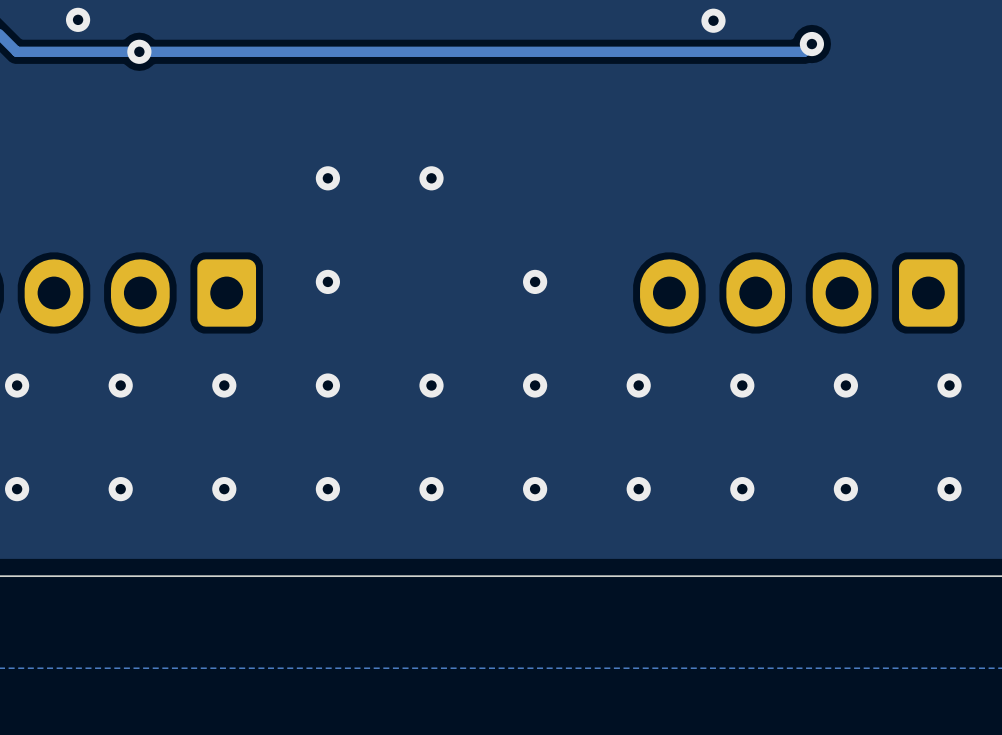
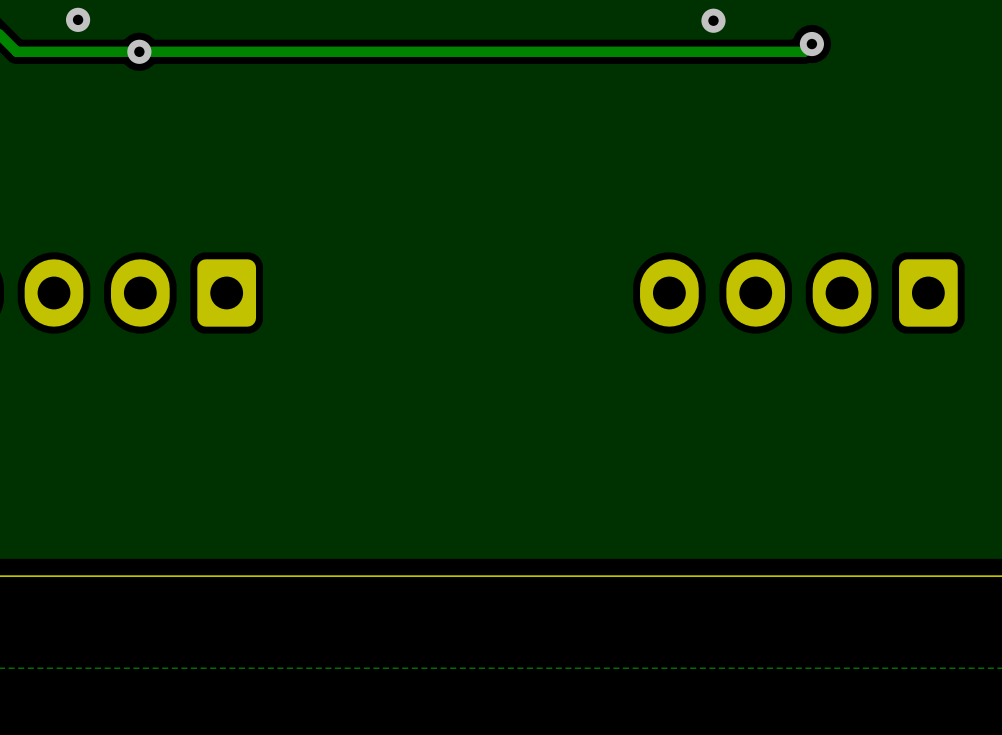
via: (327, 178) -> none
via: (431, 178) -> none
via: (327, 281) -> none
via: (535, 281) -> none
via: (17, 385) -> none
via: (120, 385) -> none
via: (224, 385) -> none
via: (327, 385) -> none
via: (431, 385) -> none
via: (535, 385) -> none
via: (638, 385) -> none
via: (742, 385) -> none
via: (845, 385) -> none
via: (949, 385) -> none
via: (17, 489) -> none
via: (120, 489) -> none
via: (224, 489) -> none
via: (327, 489) -> none
via: (431, 489) -> none
via: (535, 489) -> none
via: (638, 489) -> none
via: (742, 489) -> none
via: (845, 489) -> none
via: (949, 489) -> none

